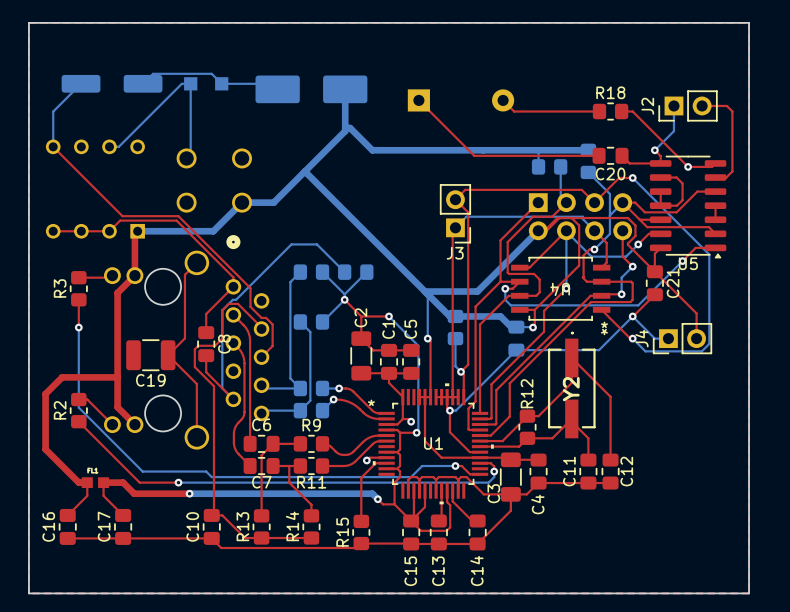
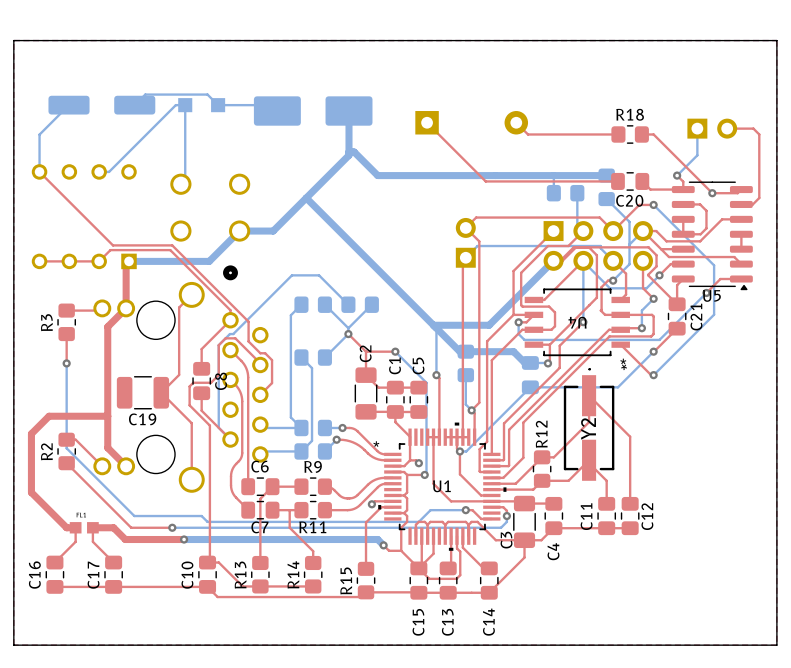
J2 side: top (688, 105) -> bottom (712, 128)
J3 side: top (455, 213) -> bottom (465, 242)
bottom track: (689, 235) (709, 254) (709, 343) (701, 351) (645, 351) (632, 338) -> (714, 265) (714, 314) (653, 375)
top track: (654, 271) (696, 313) (696, 338) -> none
bottom track: (632, 316) (654, 338) (668, 338) -> none
J4: (682, 338) -> none

